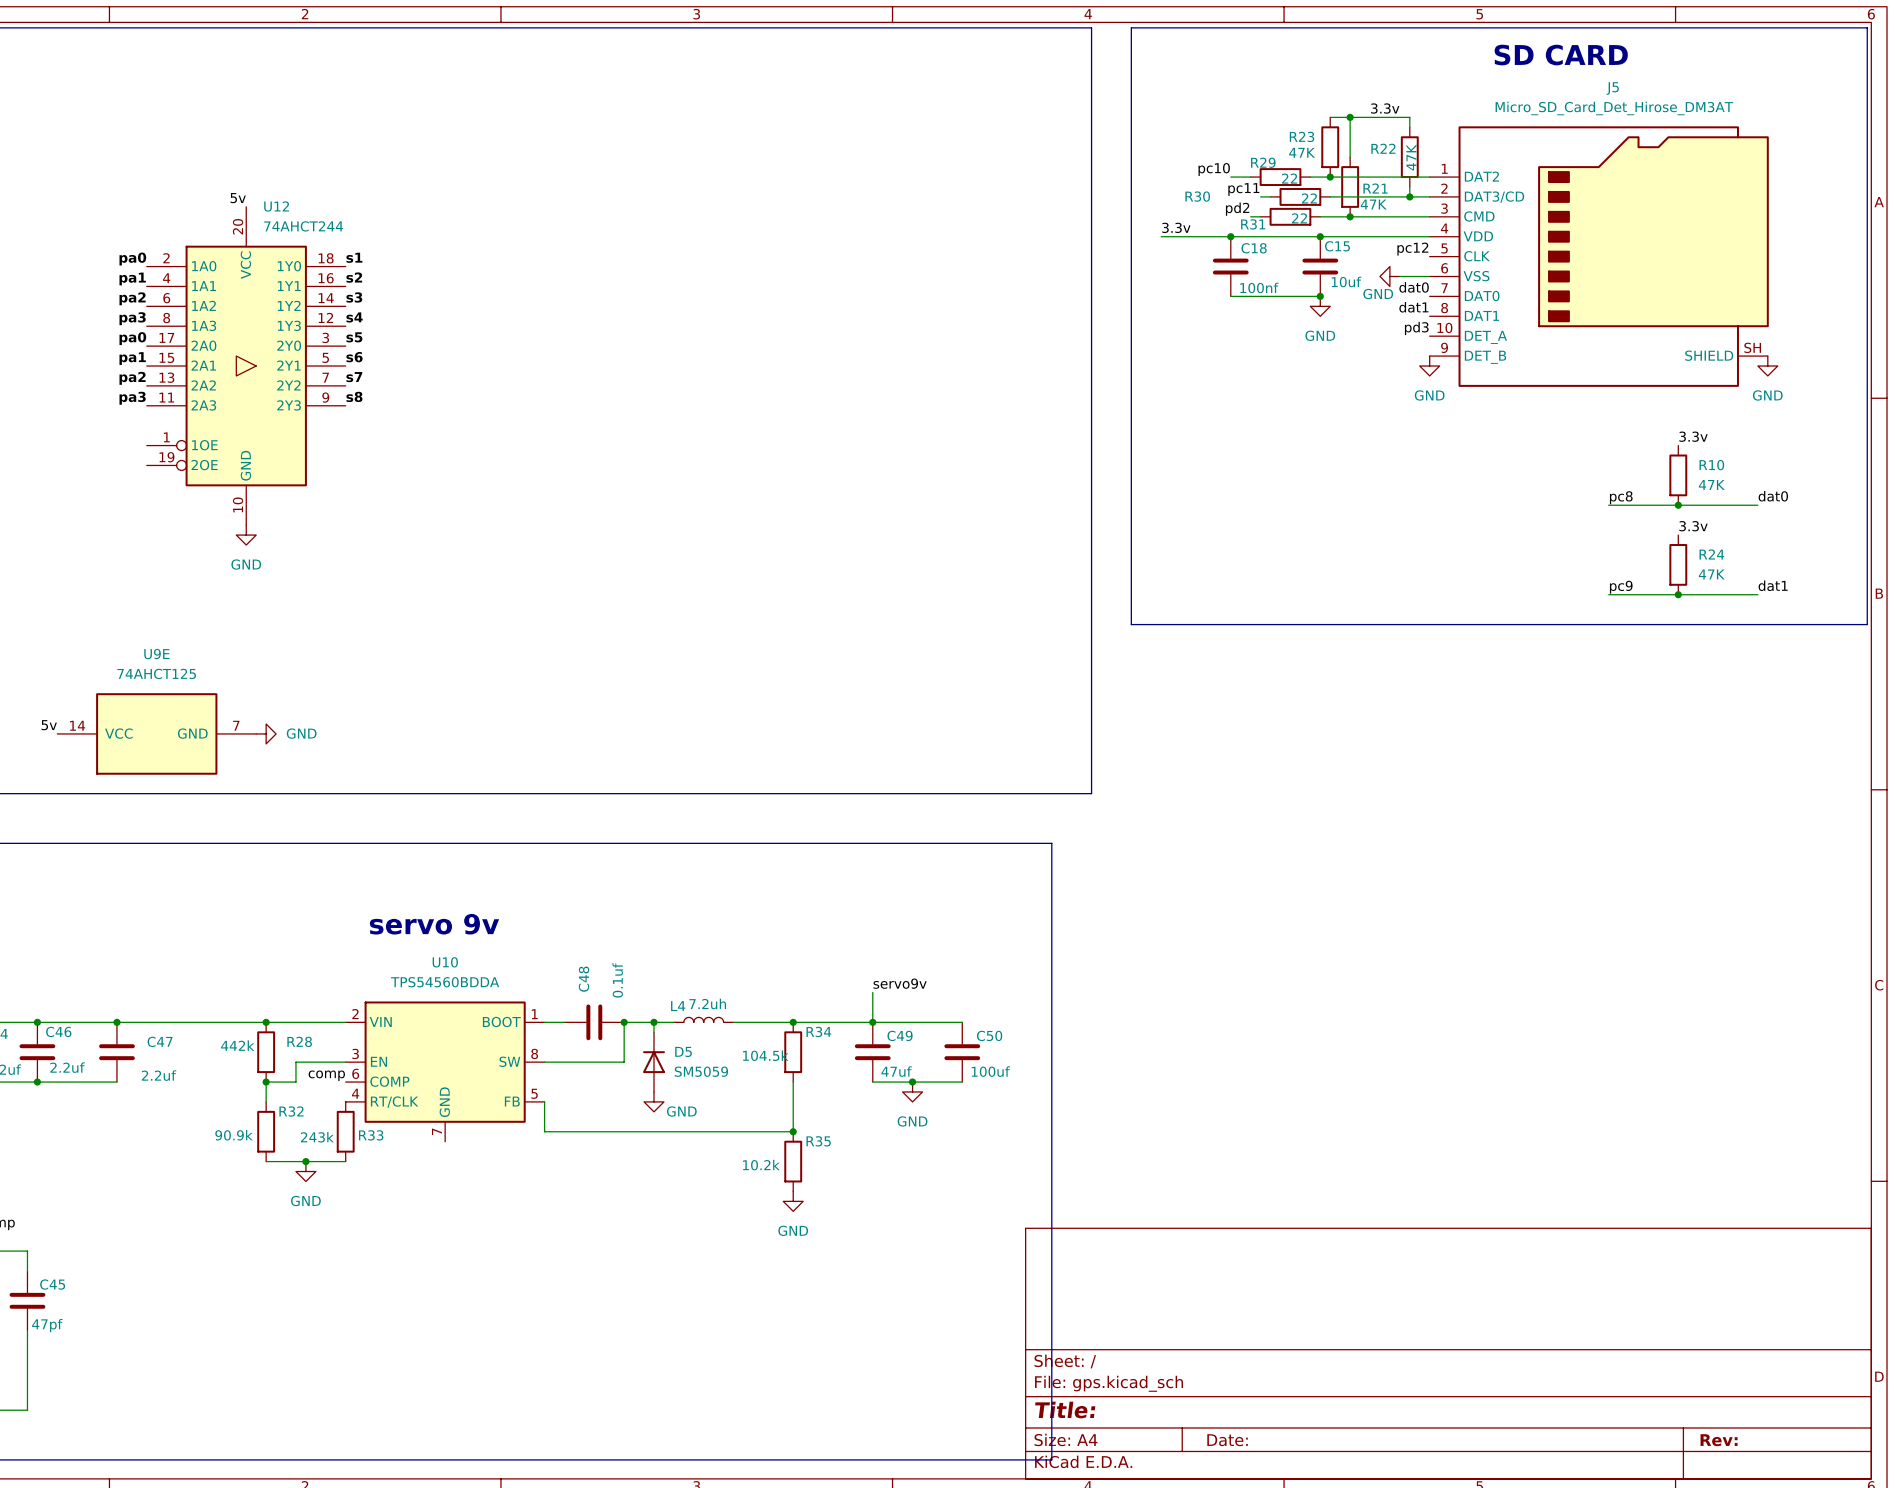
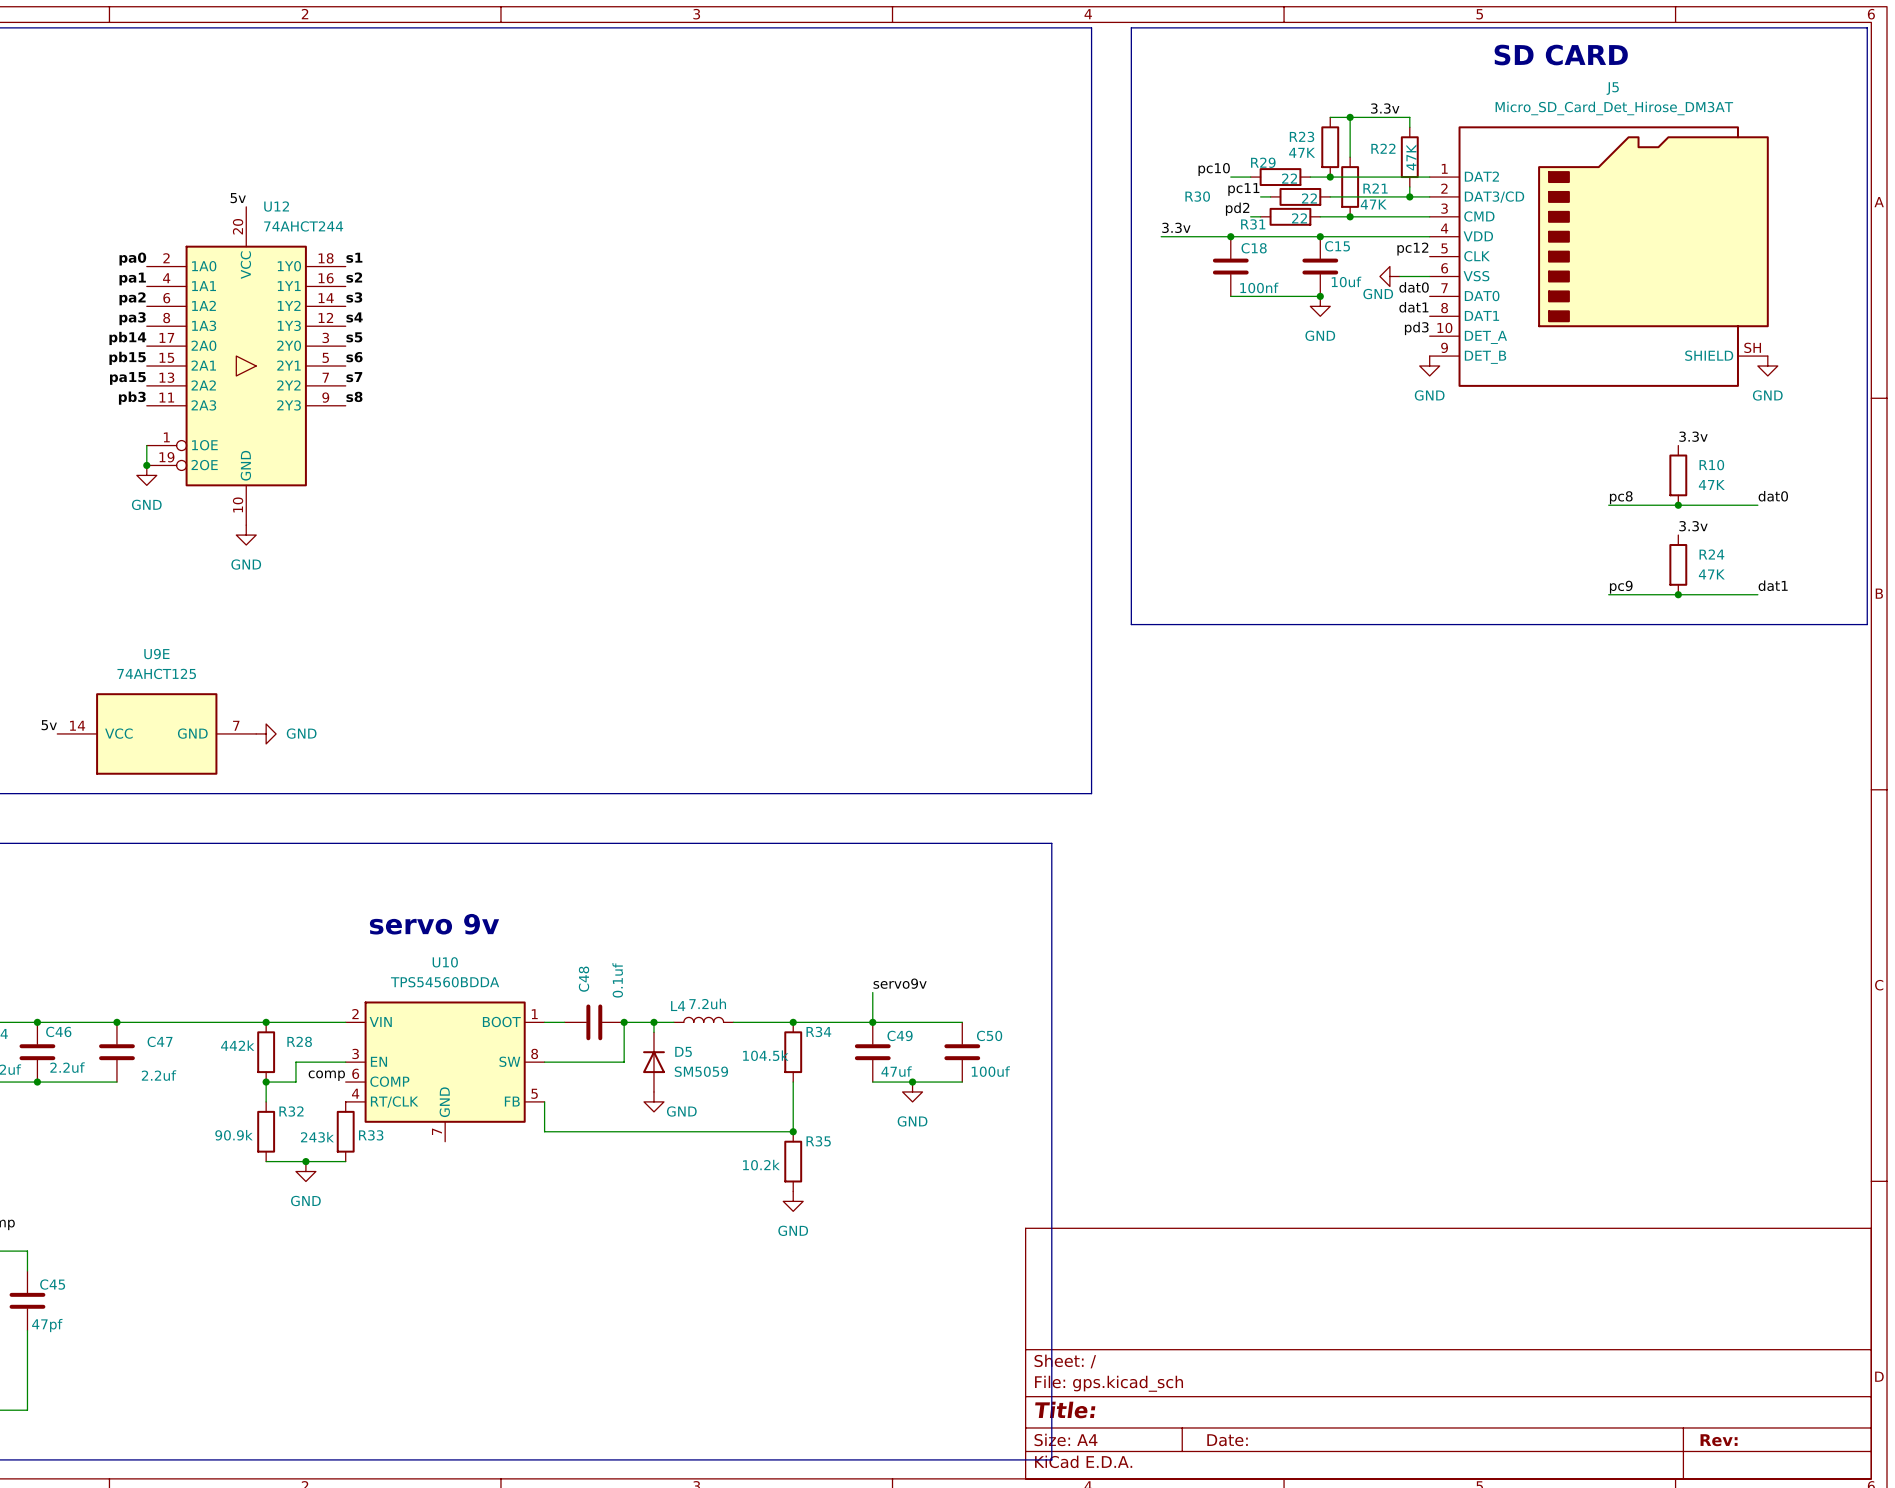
label: pa0 (132, 338) -> pb14 (127, 338)
label: pa1 (132, 358) -> pb15 (127, 358)
label: pa2 (132, 378) -> pa15 (127, 378)
label: pa3 (132, 398) -> pb3 (132, 398)
wire: none -> (146, 445) (146, 465)
junction: none -> (146, 465)
power symbol: none -> GND (146, 475)

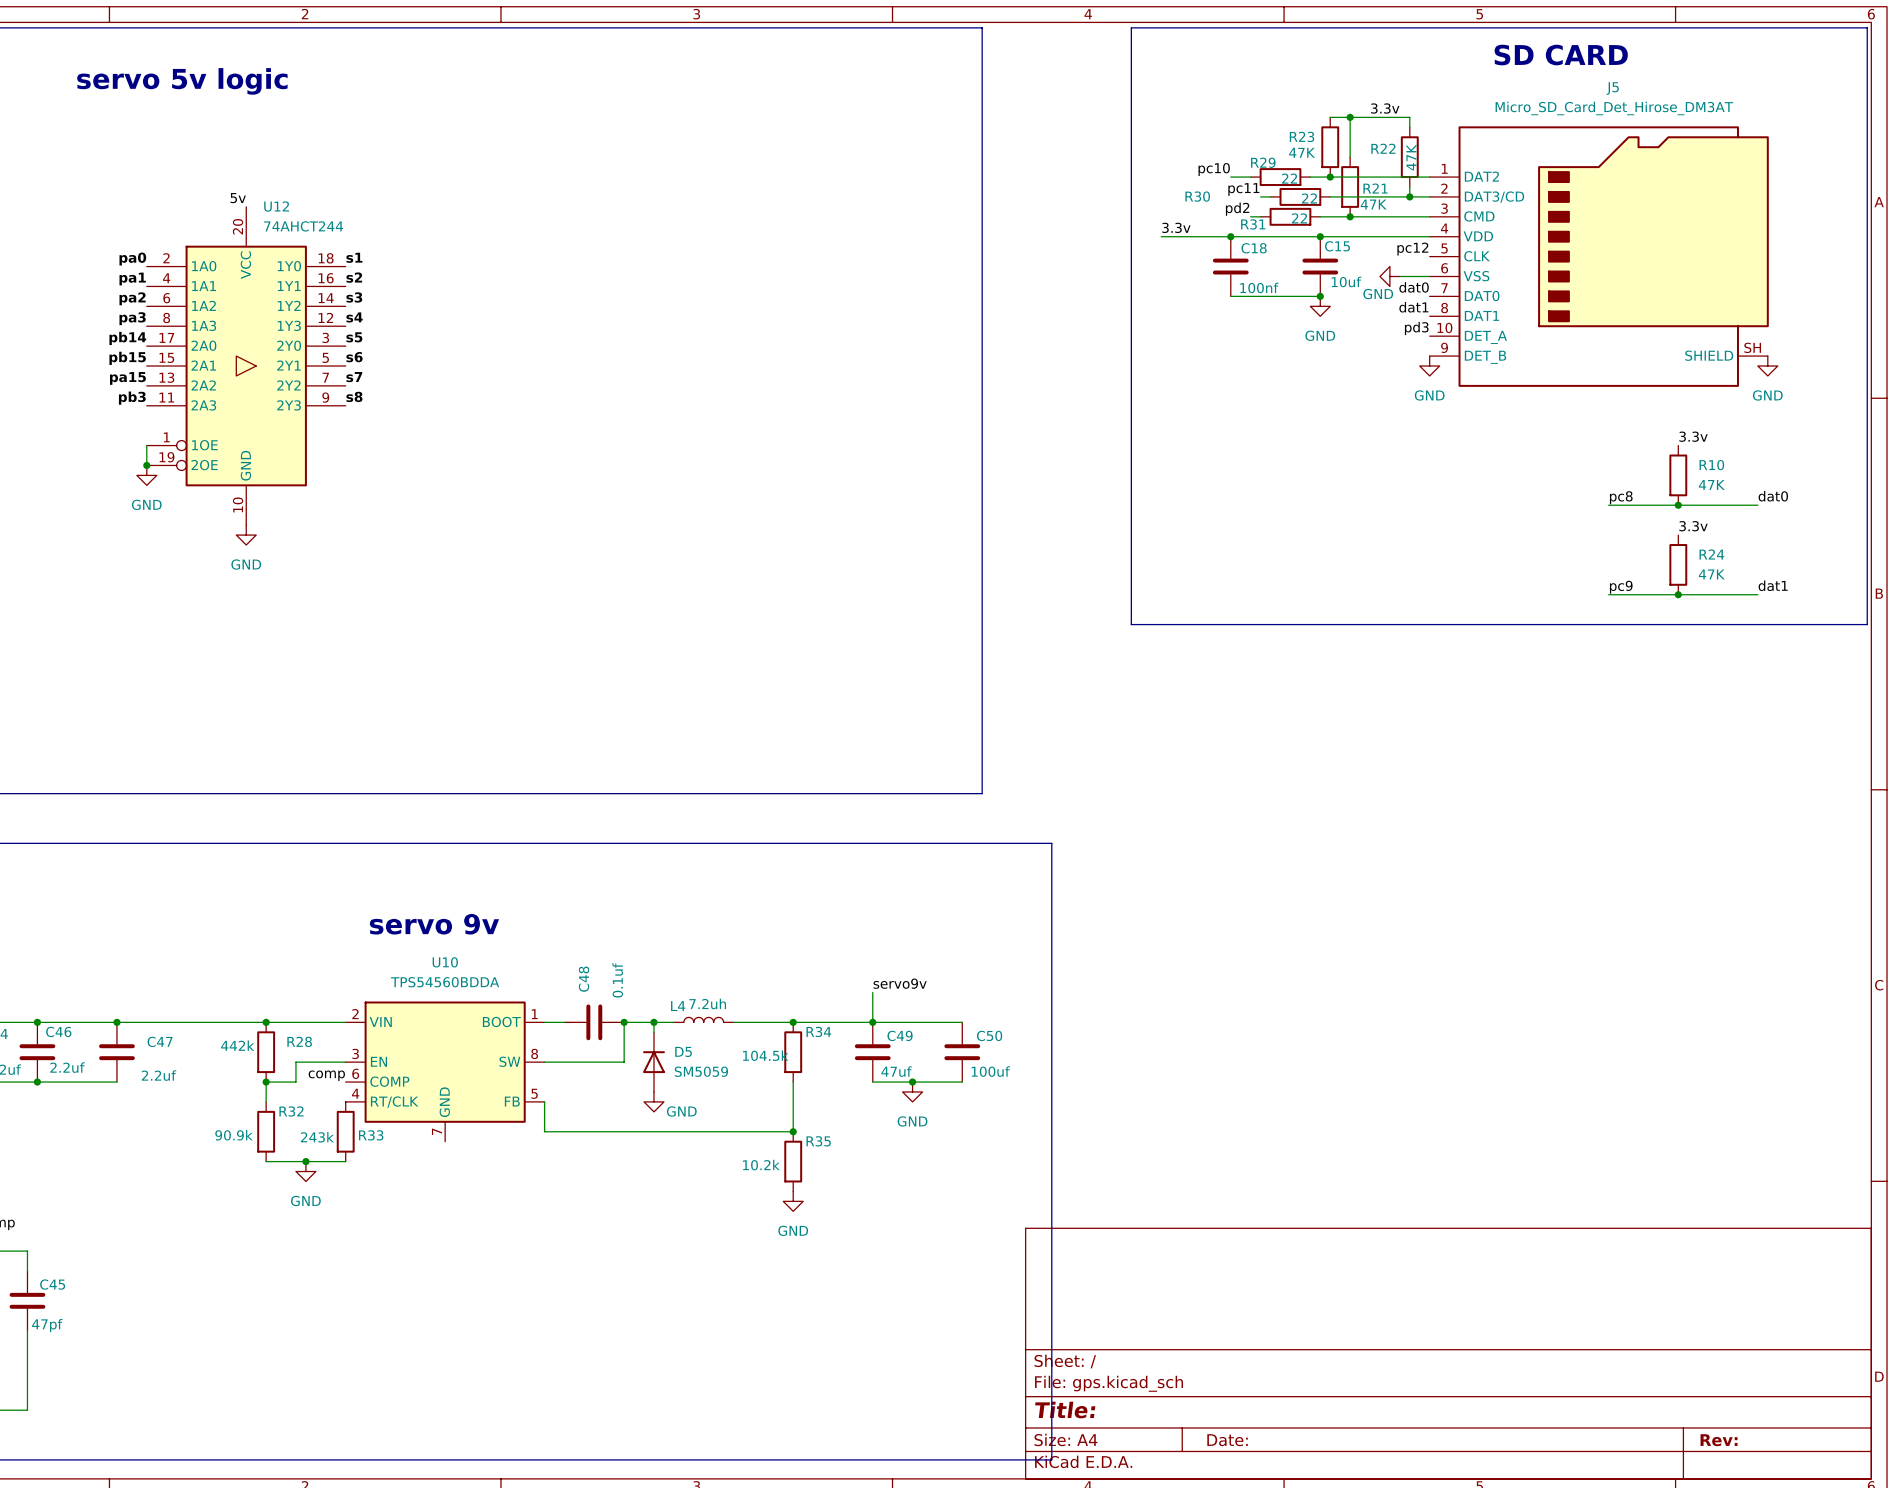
line: (982, 27) (1091, 27) (1091, 793) (982, 793) -> (982, 27) (982, 793)
text: none -> servo 5v logic (182, 81)
label: 5v (49, 725) -> none
U9E: 74AHCT125 (156, 733) -> none
power symbol: GND (266, 733) -> none

